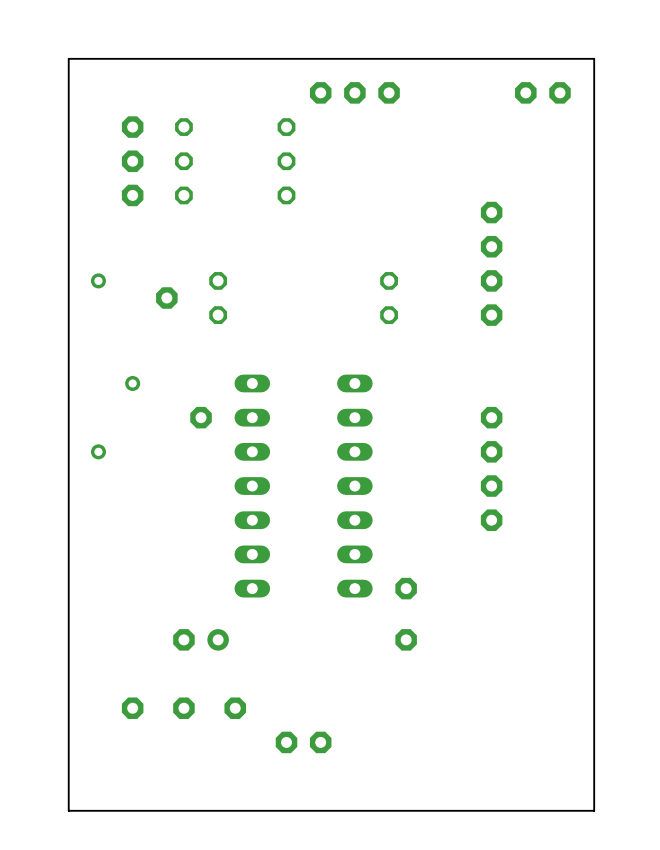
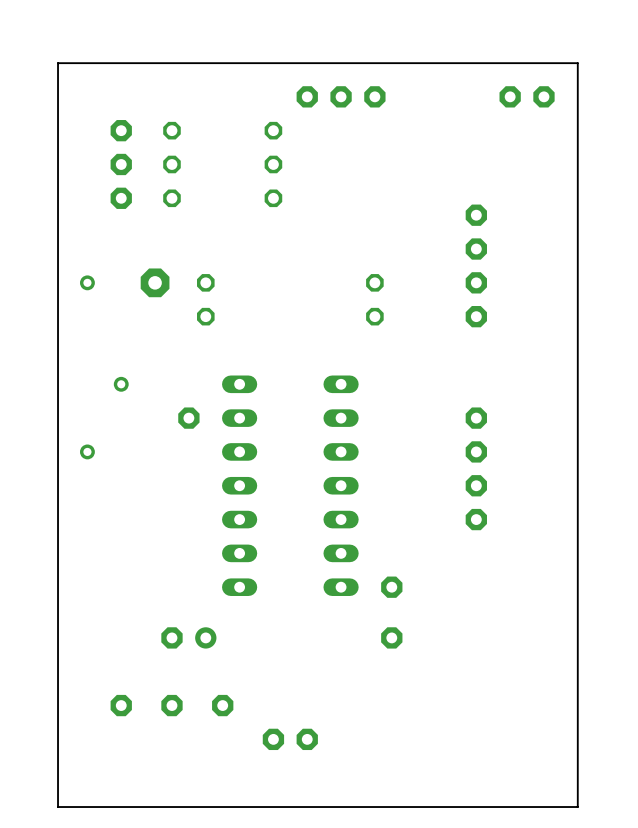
part: none -> (155, 282)
part: (166, 298) -> none

